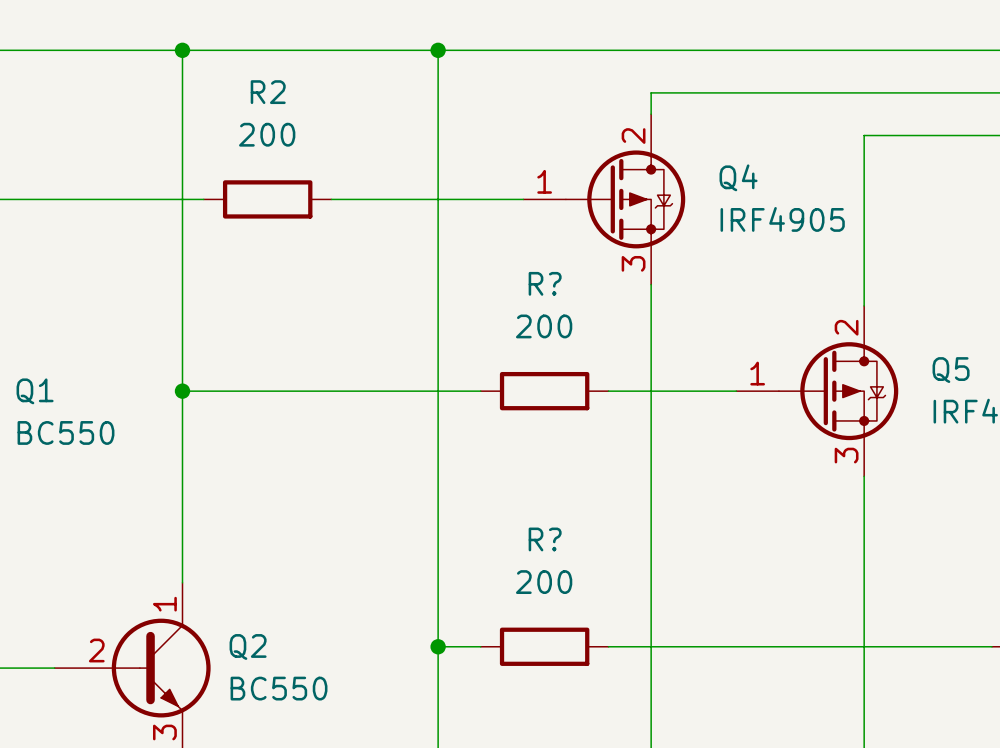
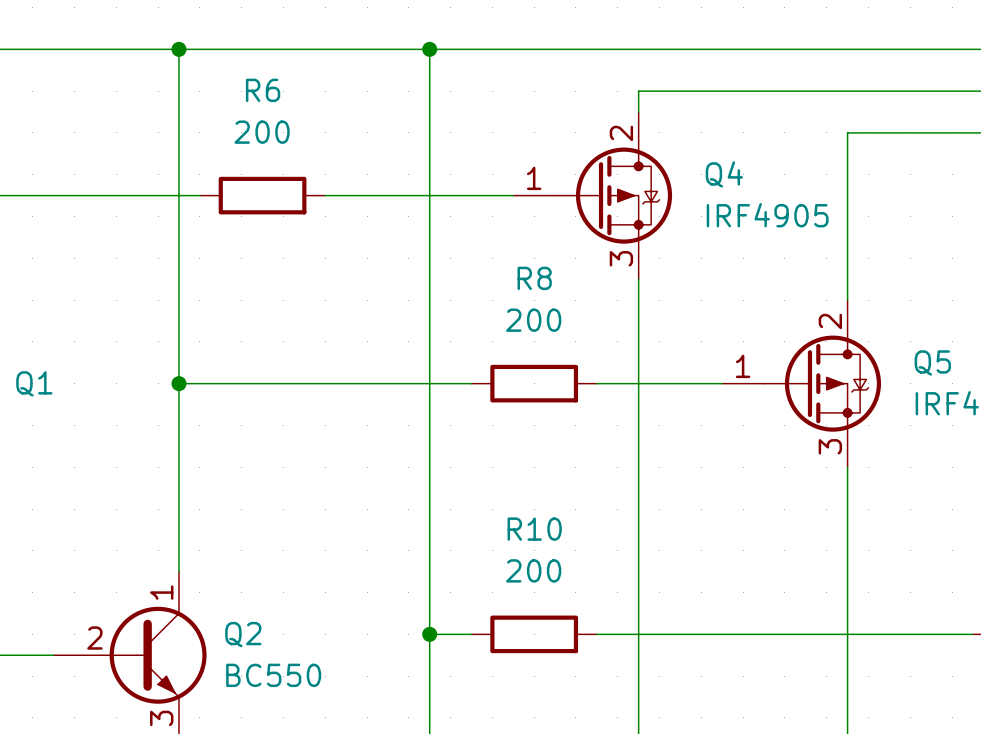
R2 name: R2 (268, 92) -> R6 (263, 90)
R? name: R? (545, 283) -> R8 (534, 278)
Q1 value: BC550 (66, 432) -> none
R? name: R? (545, 539) -> R10 (534, 529)

